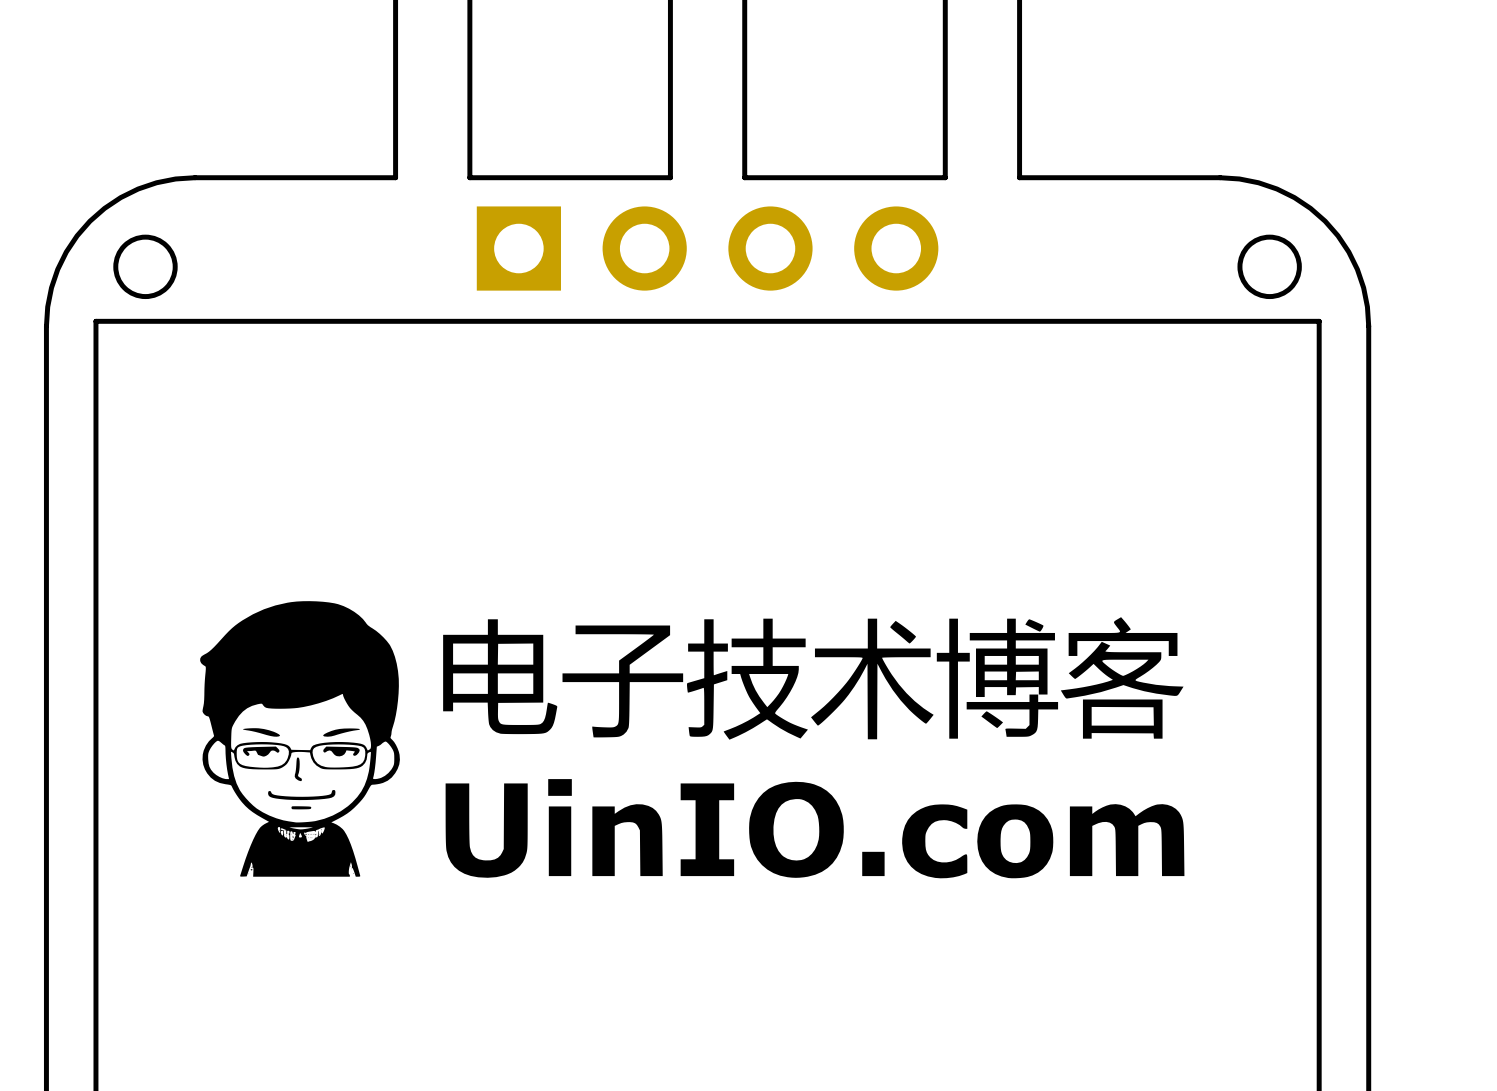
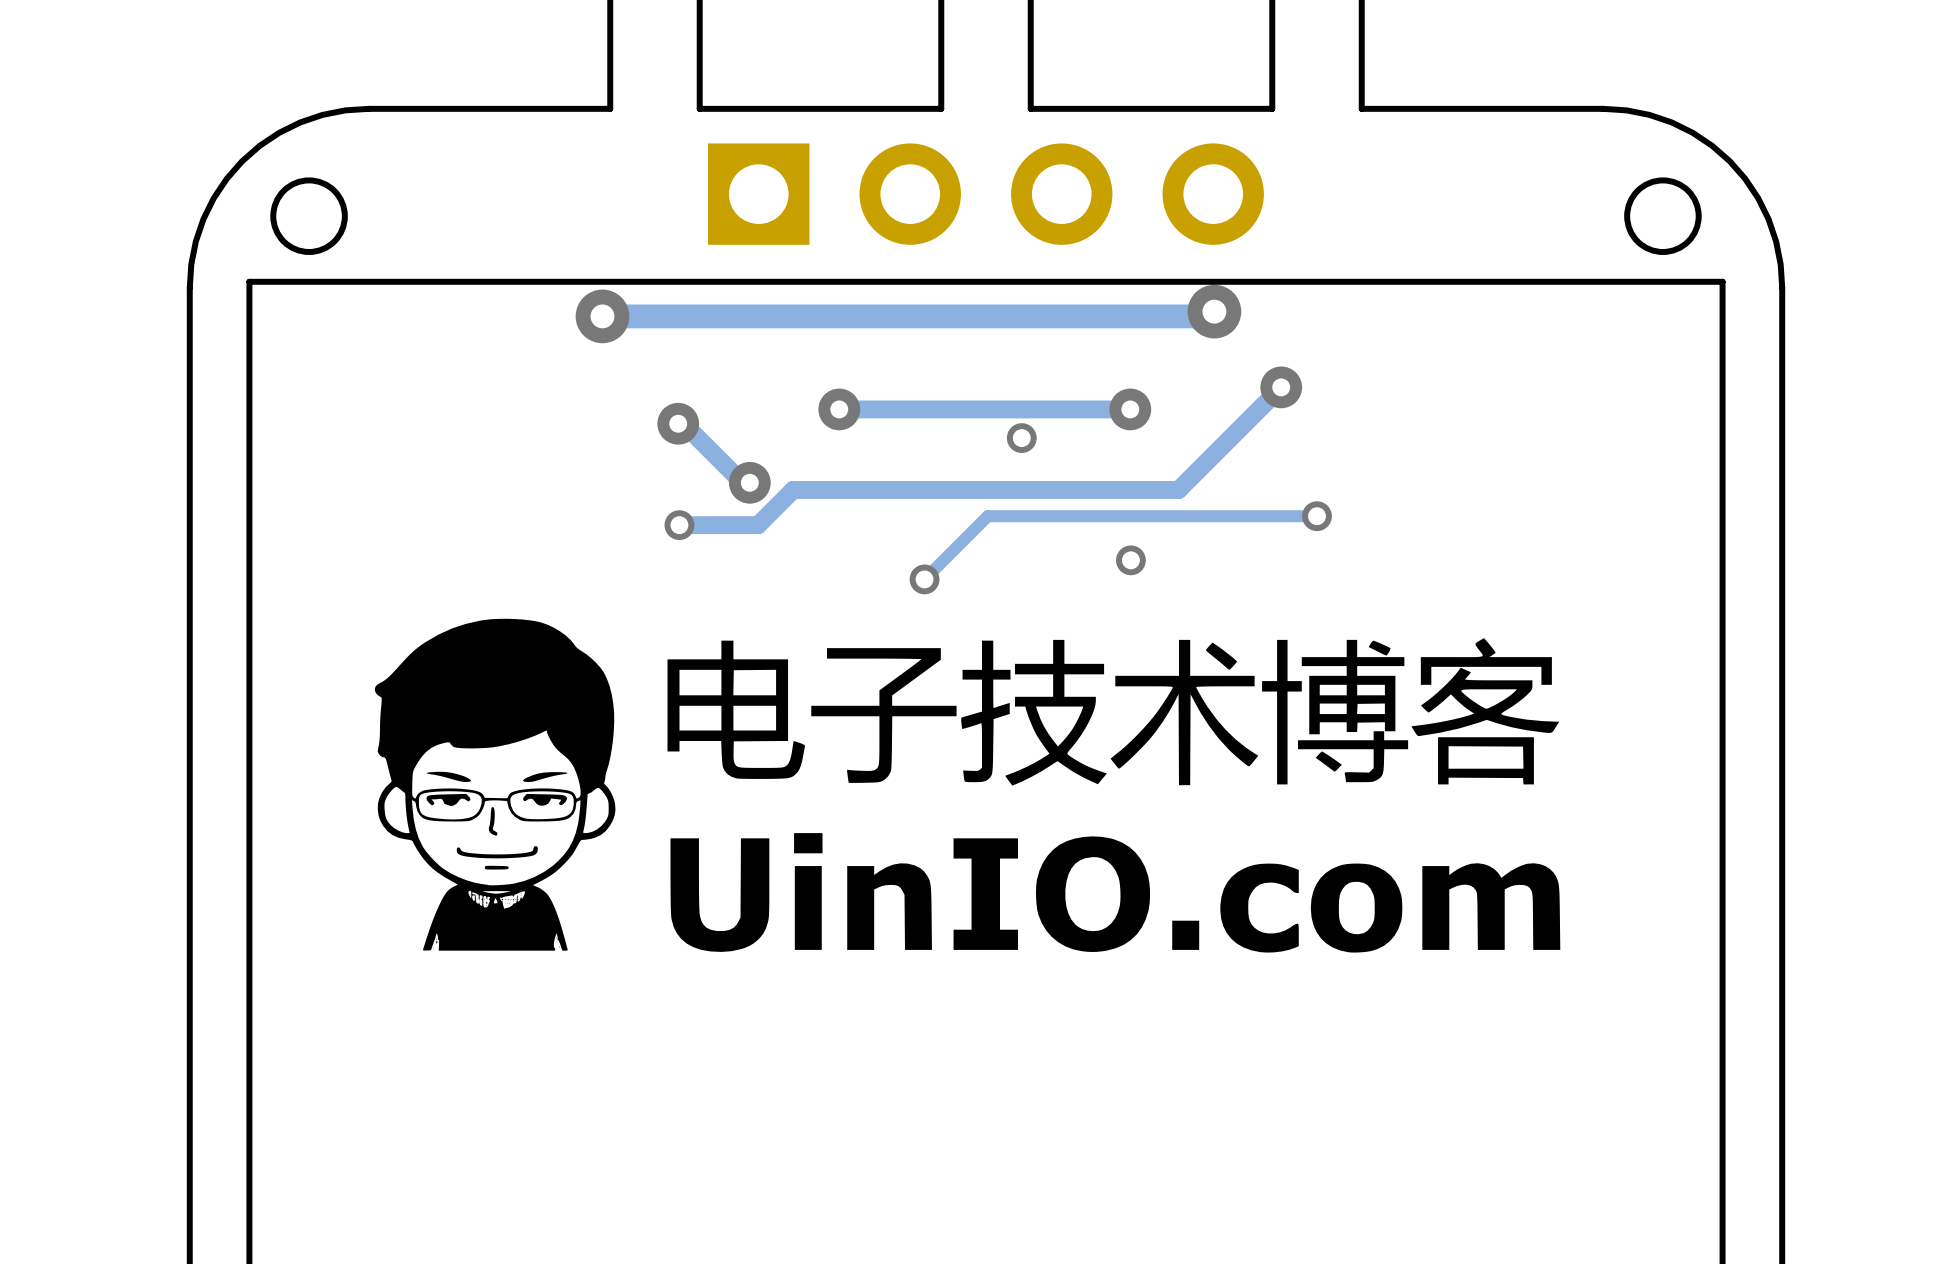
track: none -> (1214, 311) (1209, 316) (602, 316)
via: none -> (1214, 311)
via: none -> (602, 316)
track: none -> (1281, 387) (1178, 489) (793, 489) (758, 525) (679, 525)
via: none -> (1281, 387)
via: none -> (839, 409)
track: none -> (1130, 409) (839, 409)
via: none -> (1130, 409)
track: none -> (678, 423) (683, 423) (742, 482) (749, 482)
via: none -> (678, 423)
via: none -> (1021, 438)
via: none -> (749, 482)
track: none -> (1317, 516) (987, 516) (924, 579)
via: none -> (1317, 516)
via: none -> (679, 525)
via: none -> (1130, 560)
via: none -> (924, 579)

